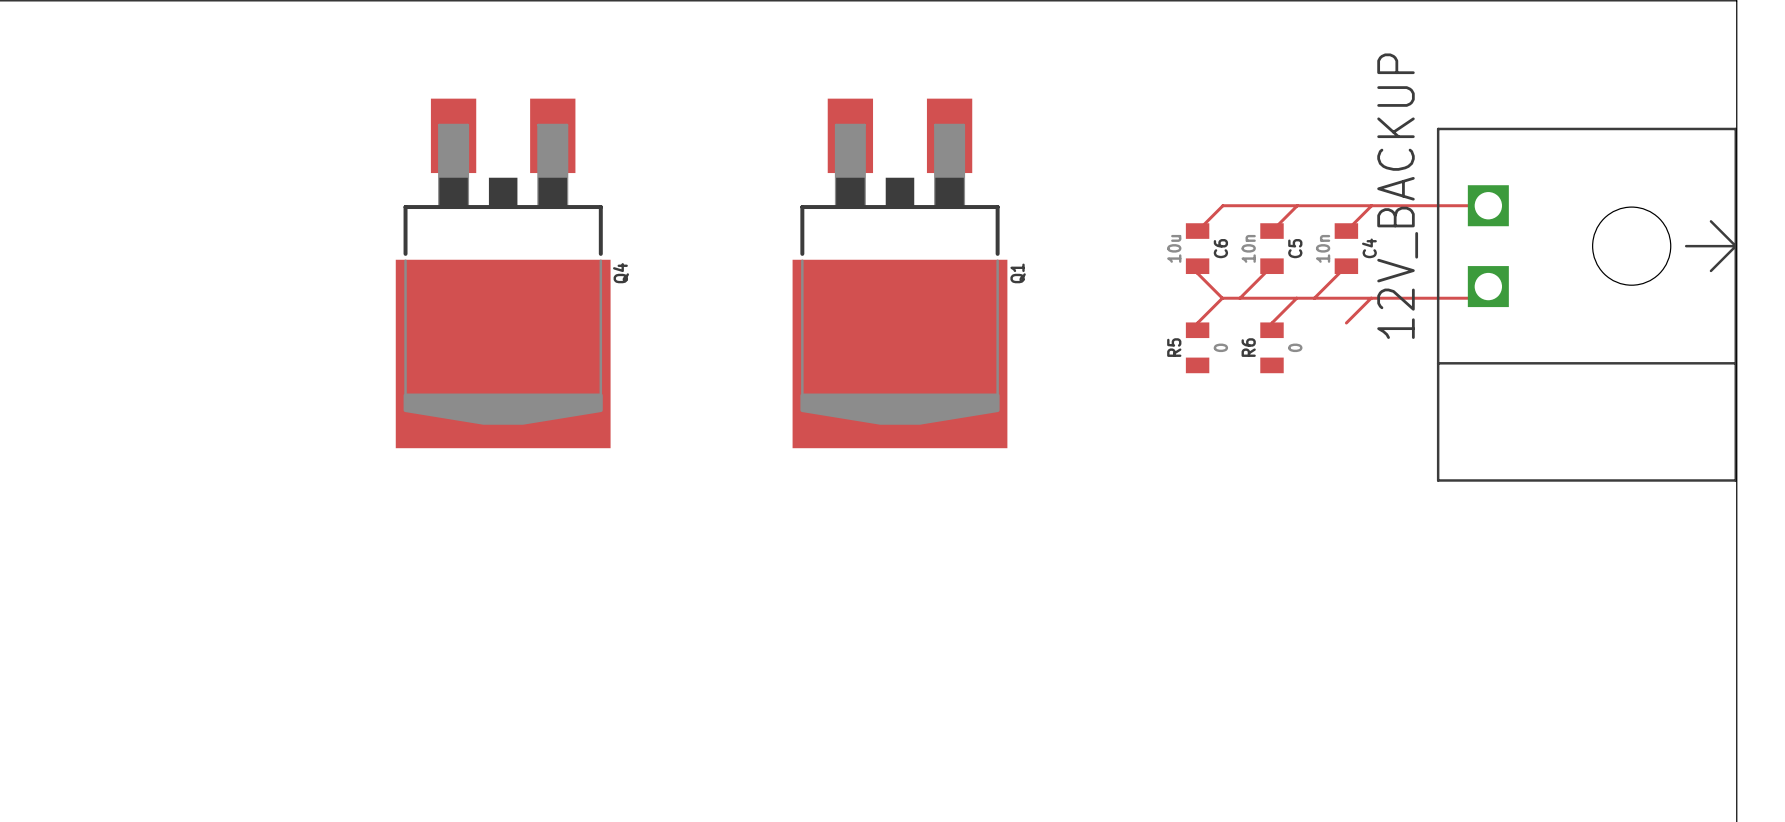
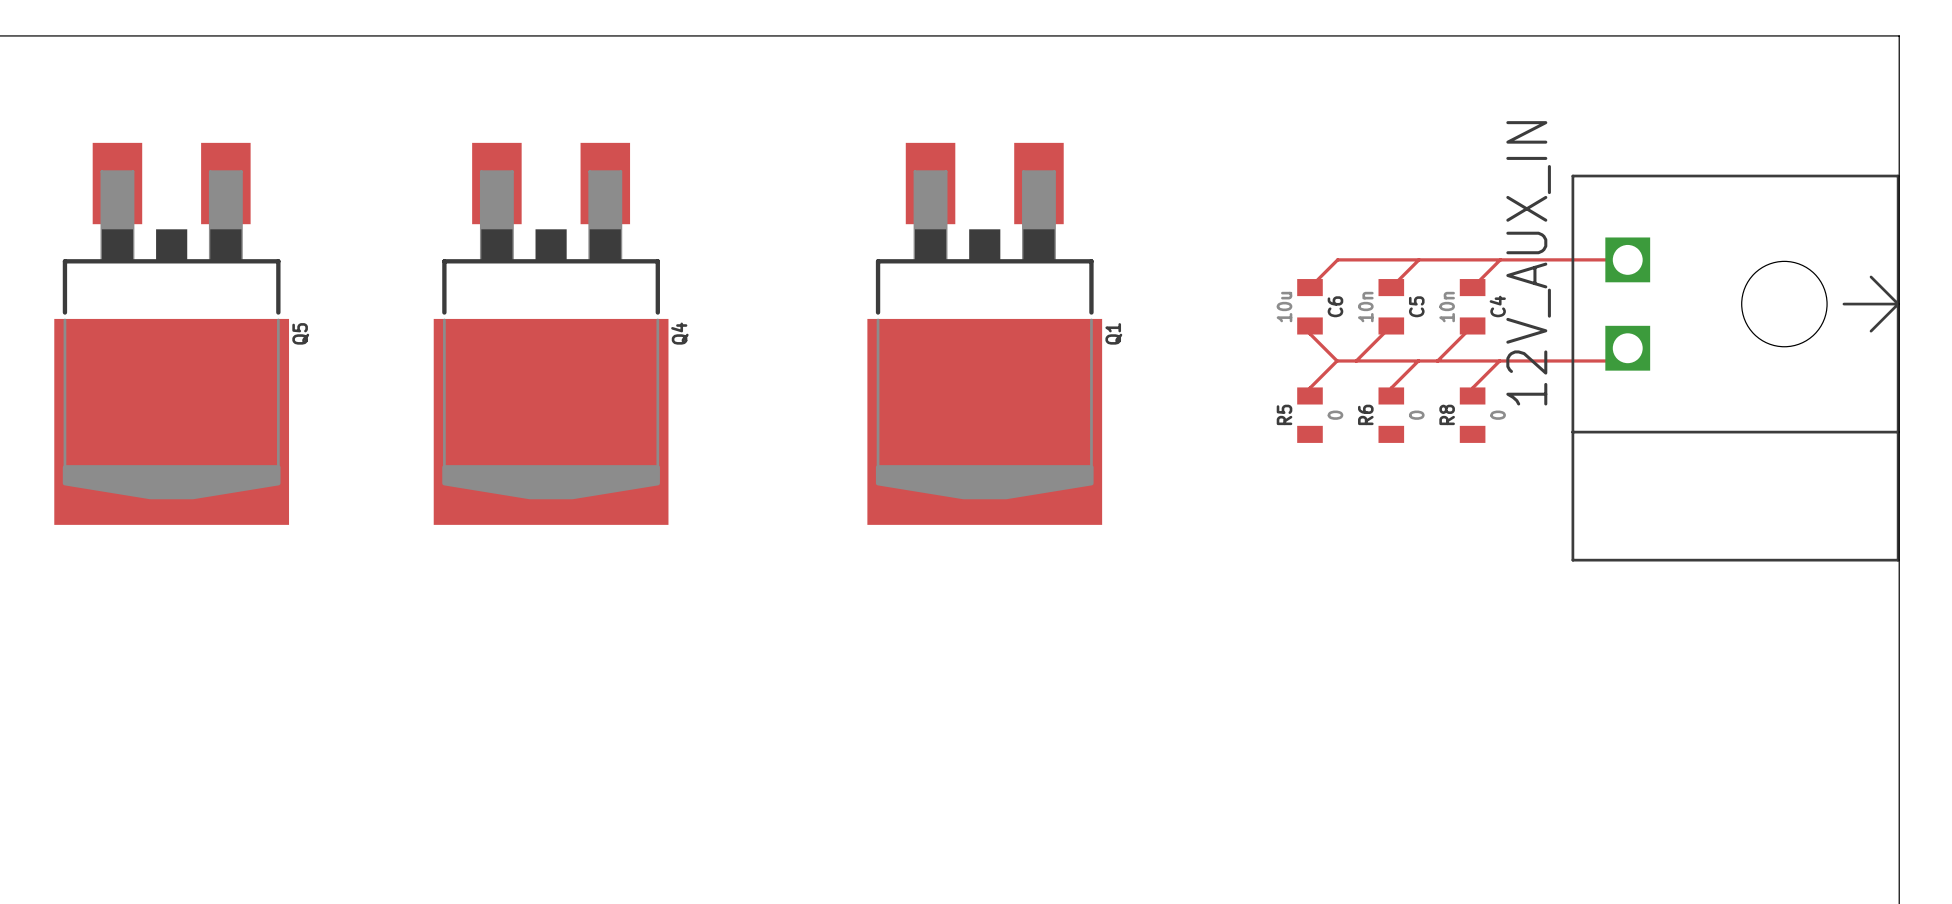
12V_BACKUP name: 12V_BACKUP (1397, 196) -> 12V_AUX_IN (1528, 263)
Q5: none -> (171, 333)
R8: none -> 0 (1472, 415)

